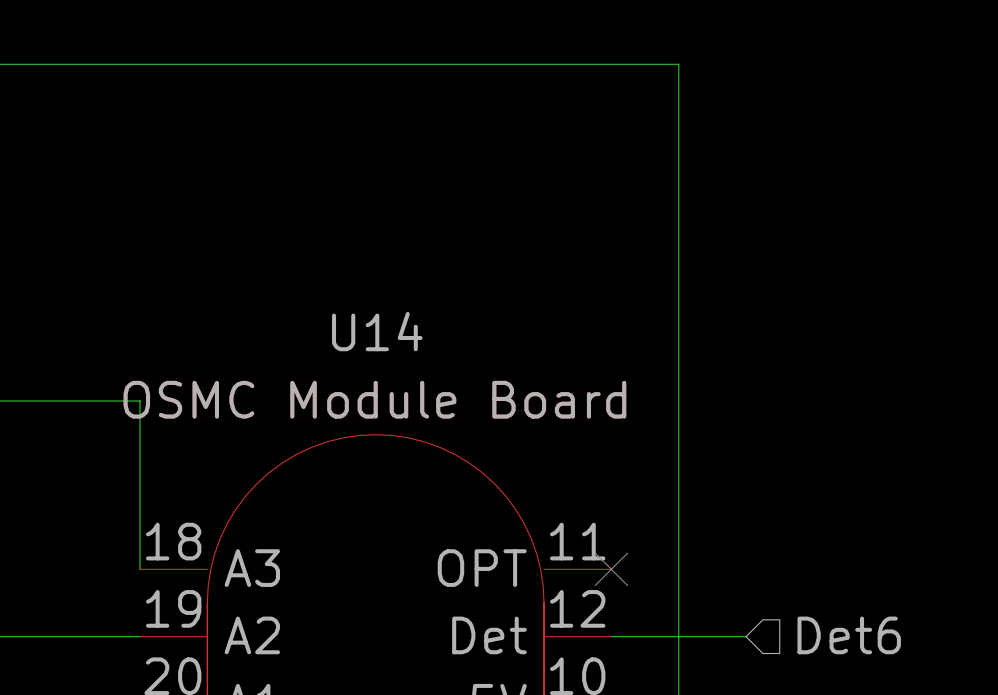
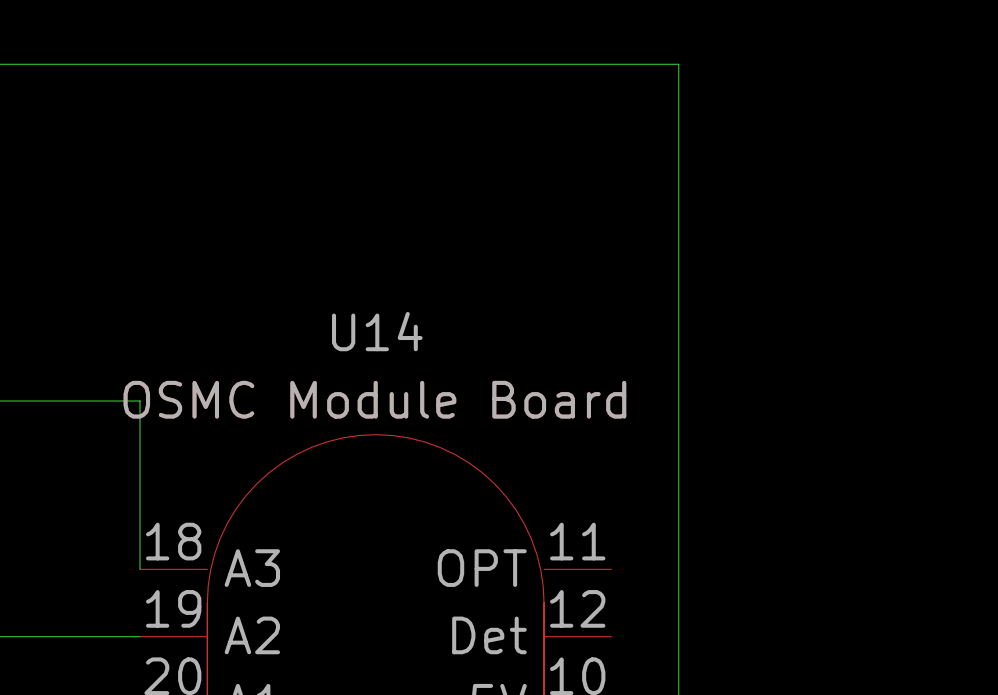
no-connect mark: (611, 569) -> none
hierarchical label: Det6 (849, 635) -> none
wire: (611, 636) (746, 636) -> none

